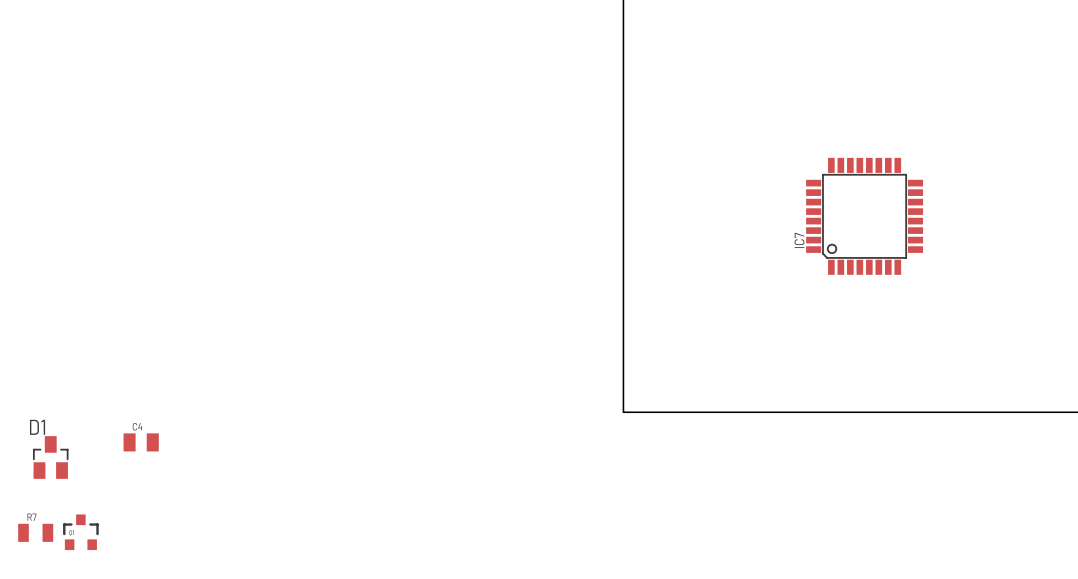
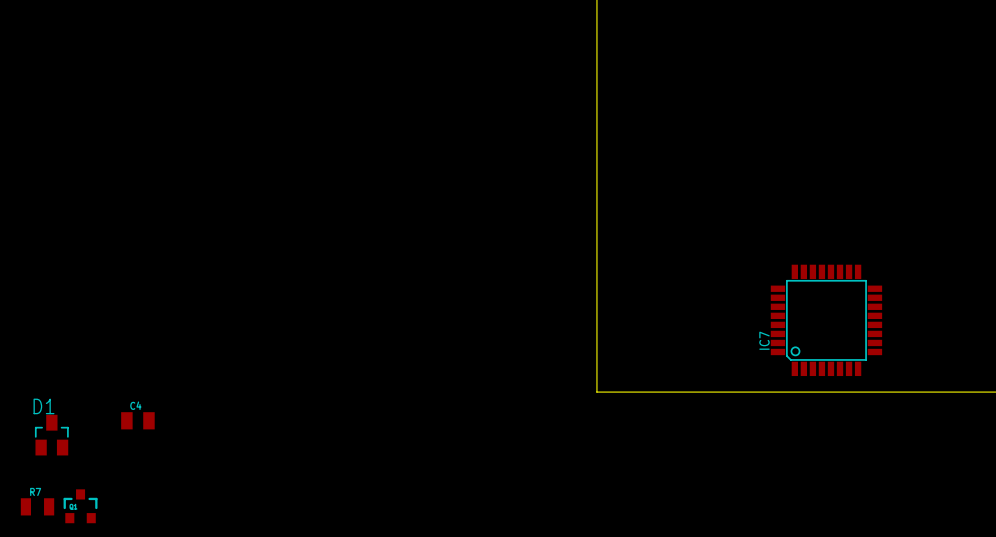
IC7 position: (864, 216) -> (826, 320)

